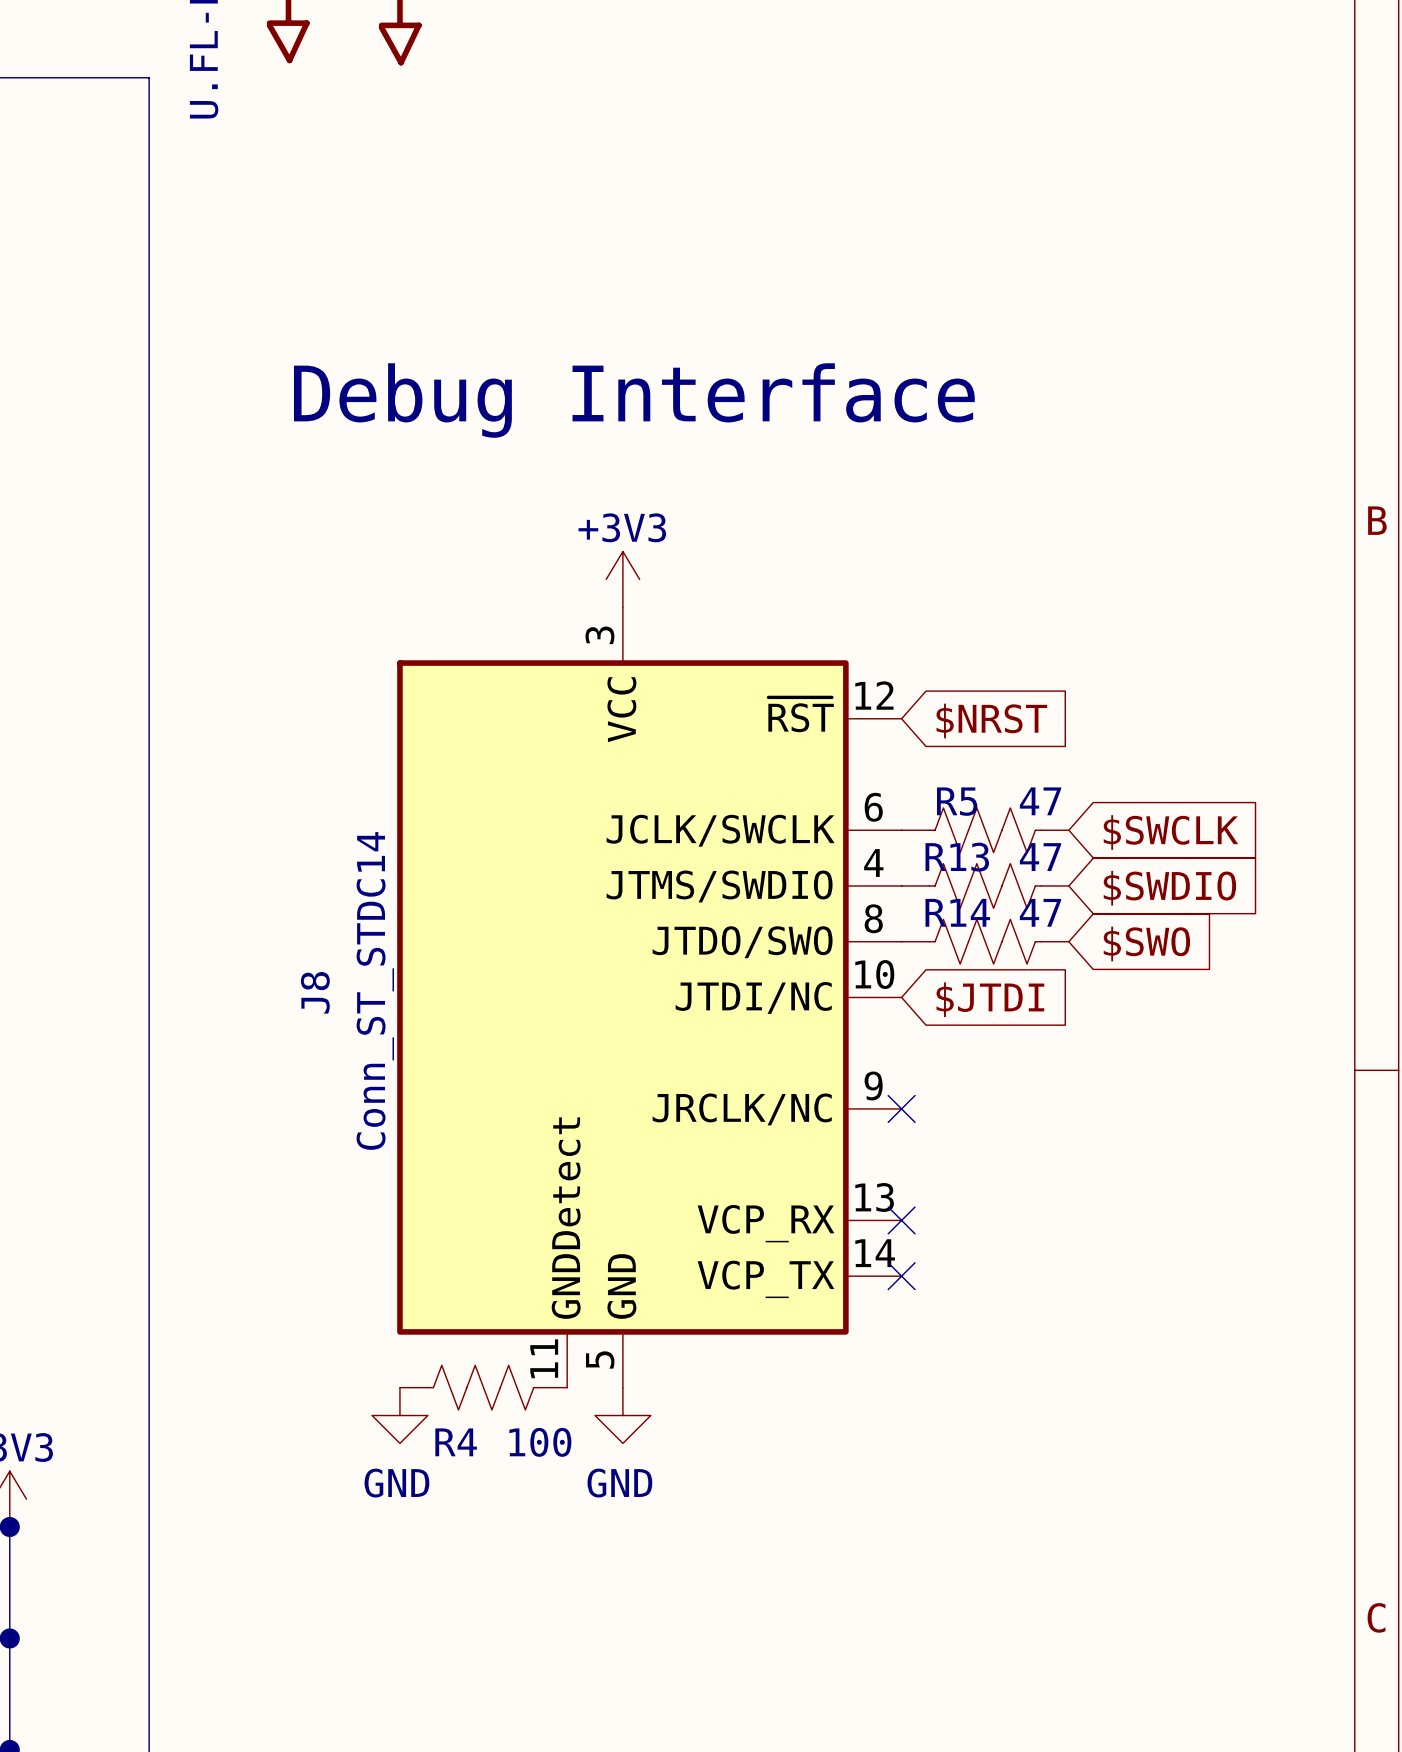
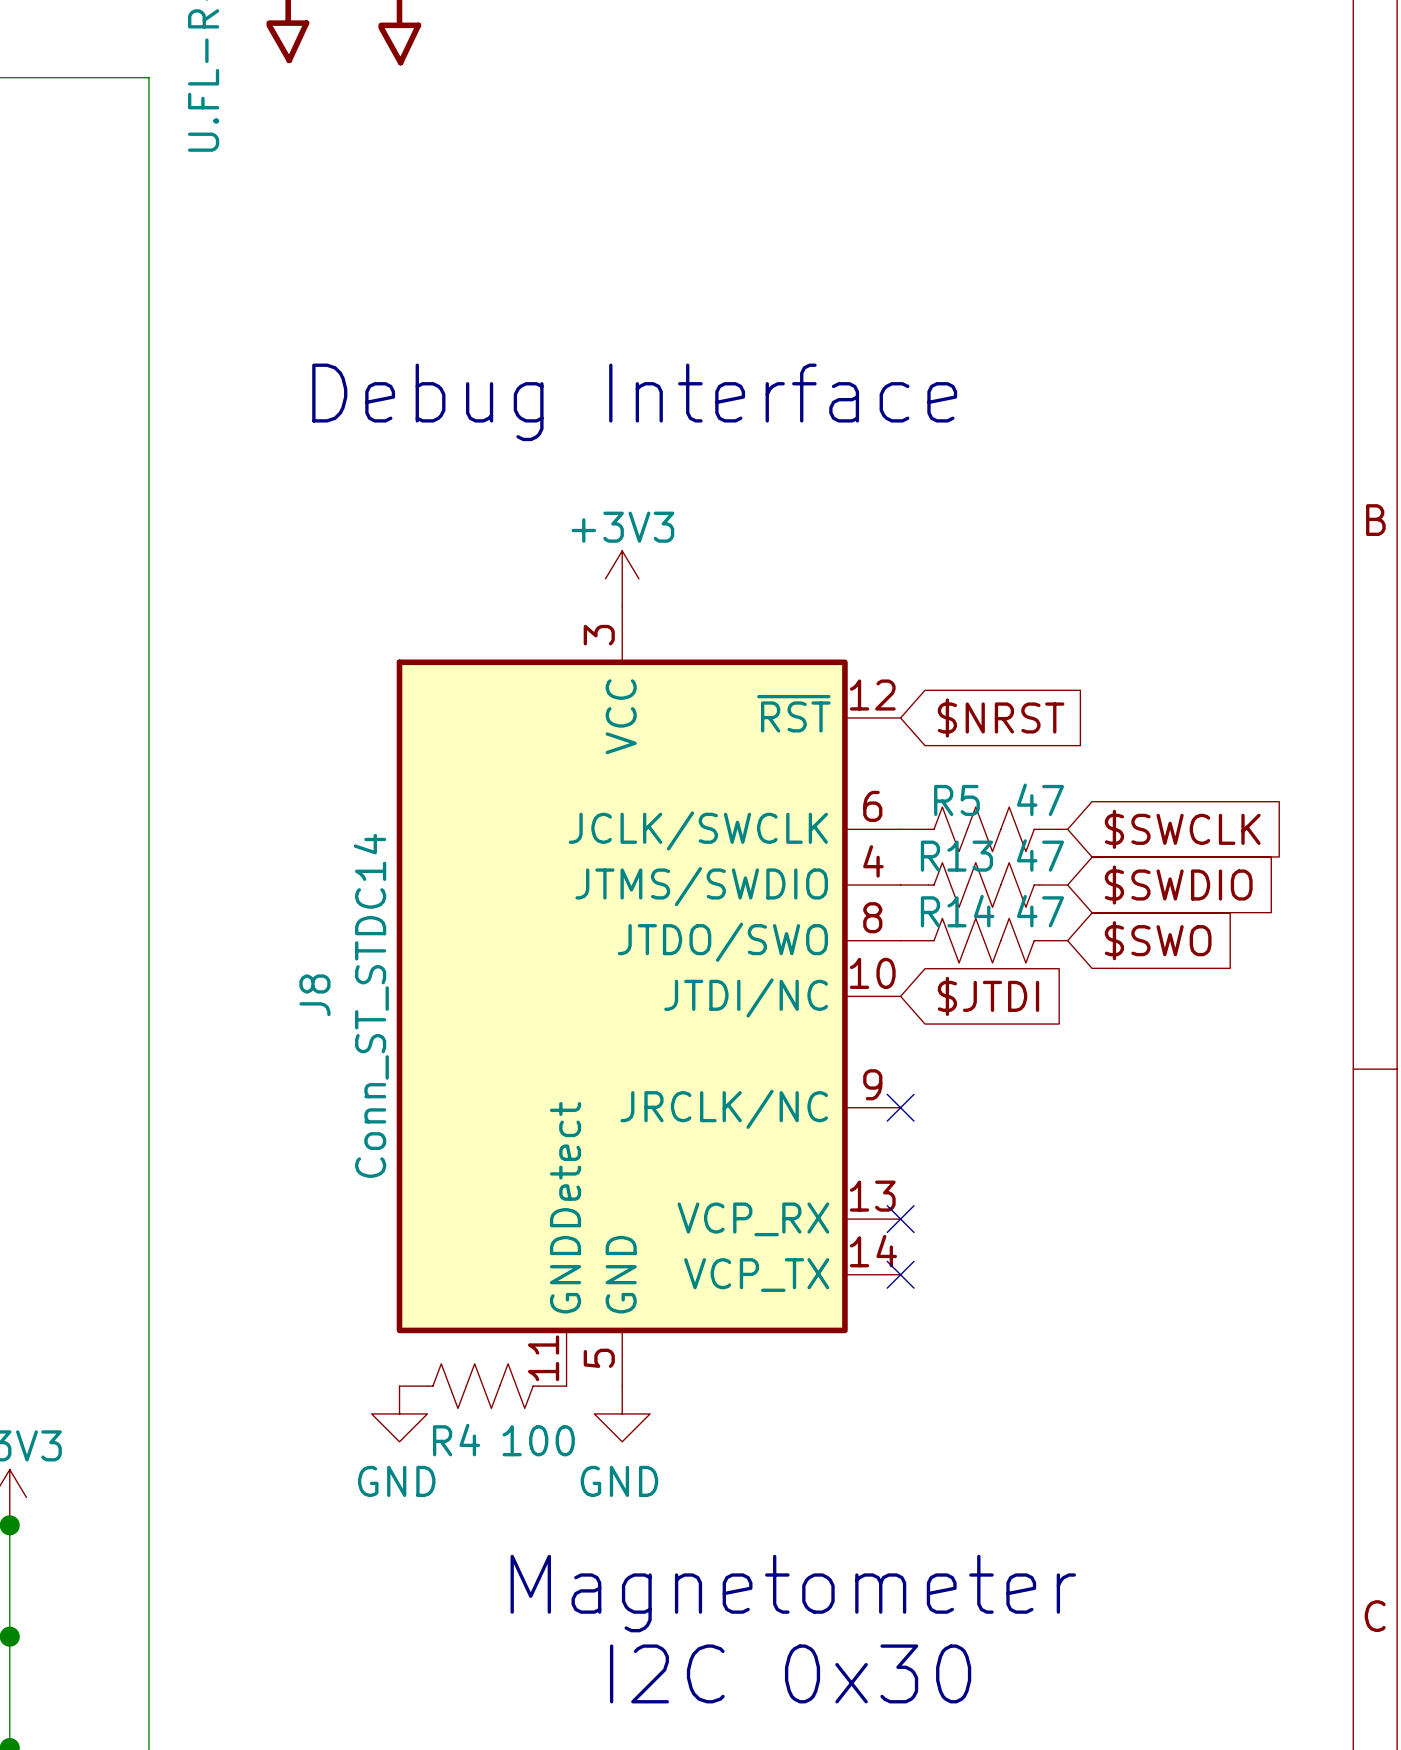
text: none -> Magnetometer (793, 1593)
text: none -> I2C 0x30 (790, 1673)

